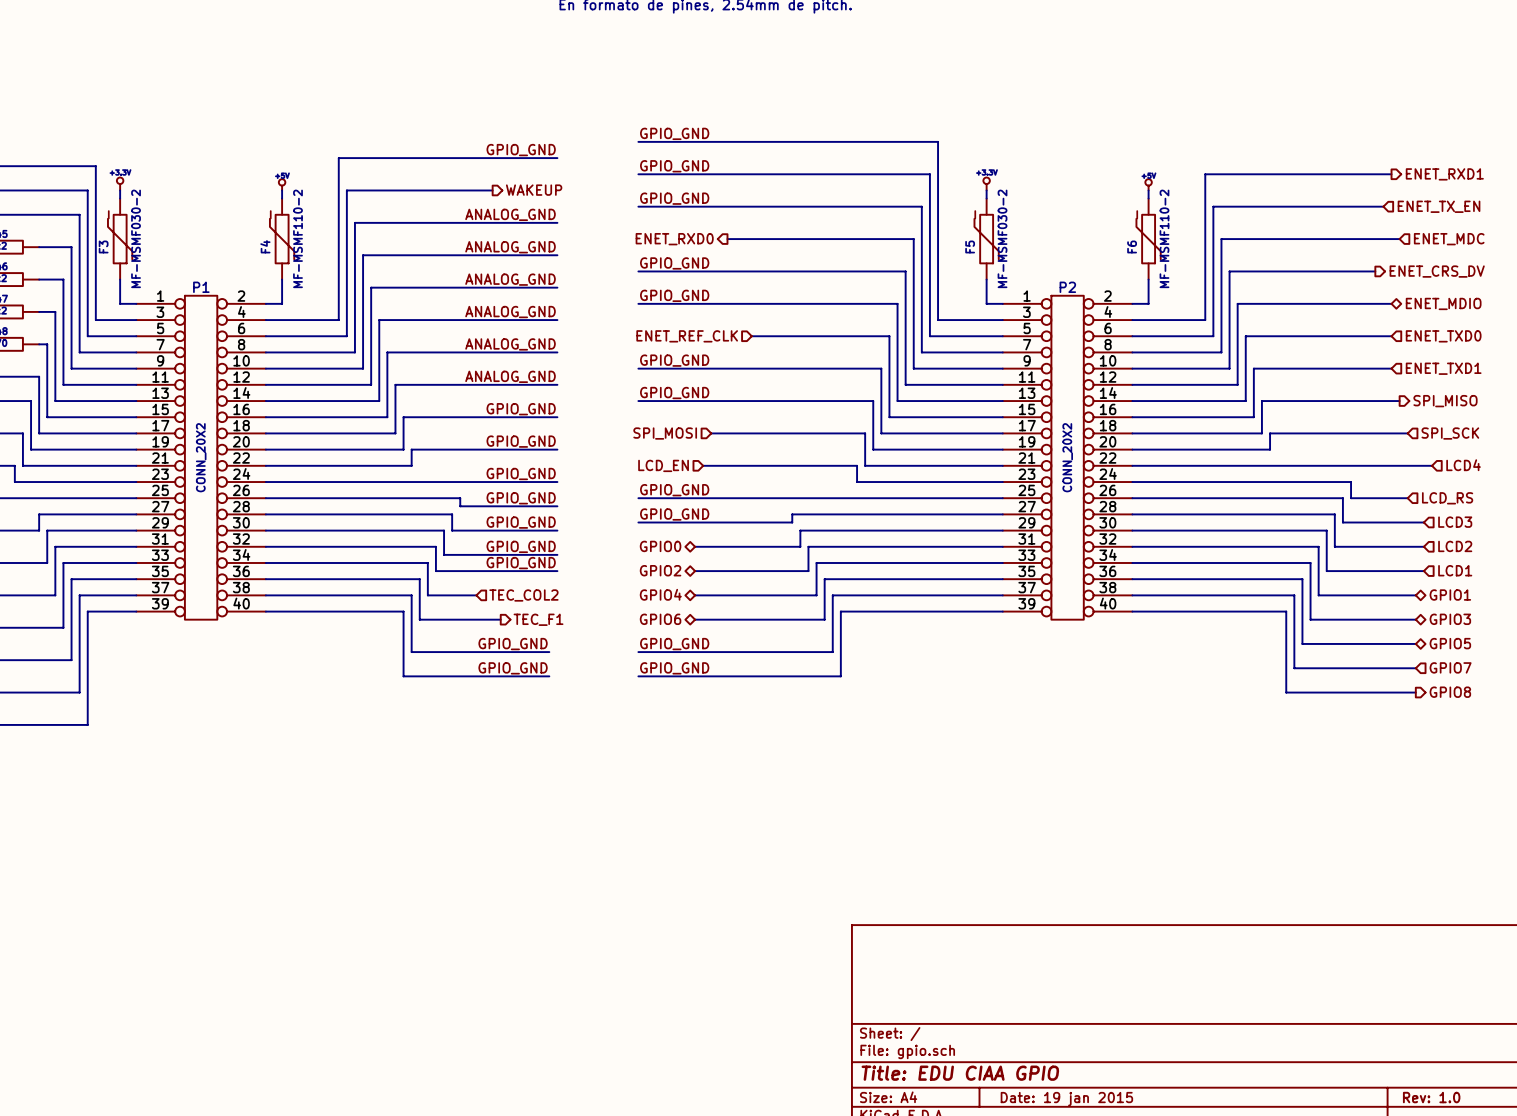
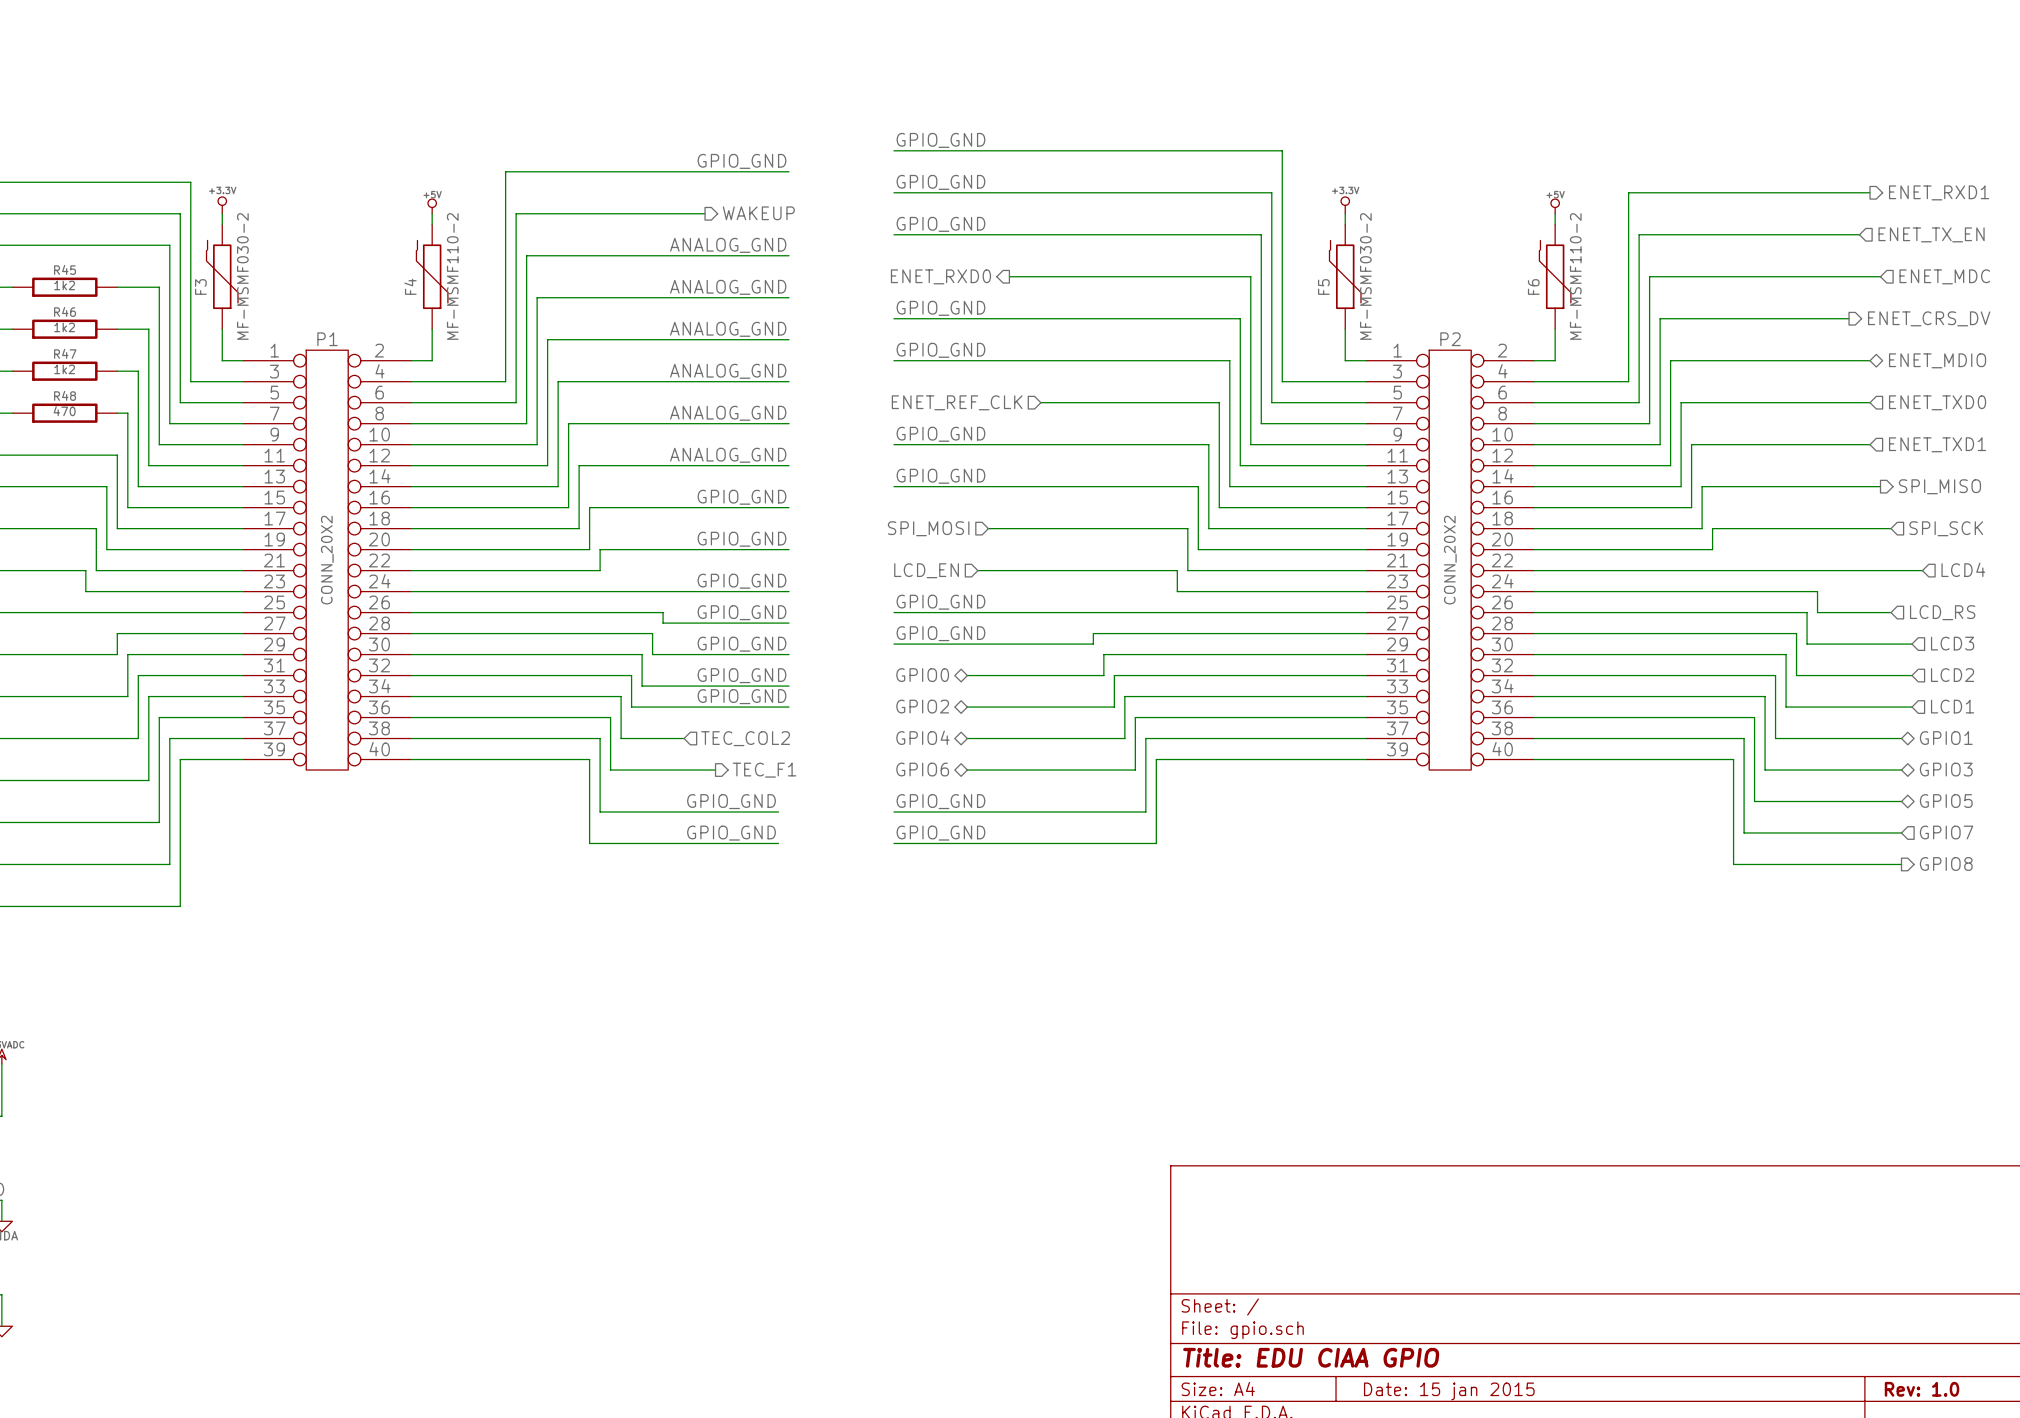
title block: Date: 19 jan 2015 (1066, 1099) -> Date: 15 jan 2015 (1449, 1391)

